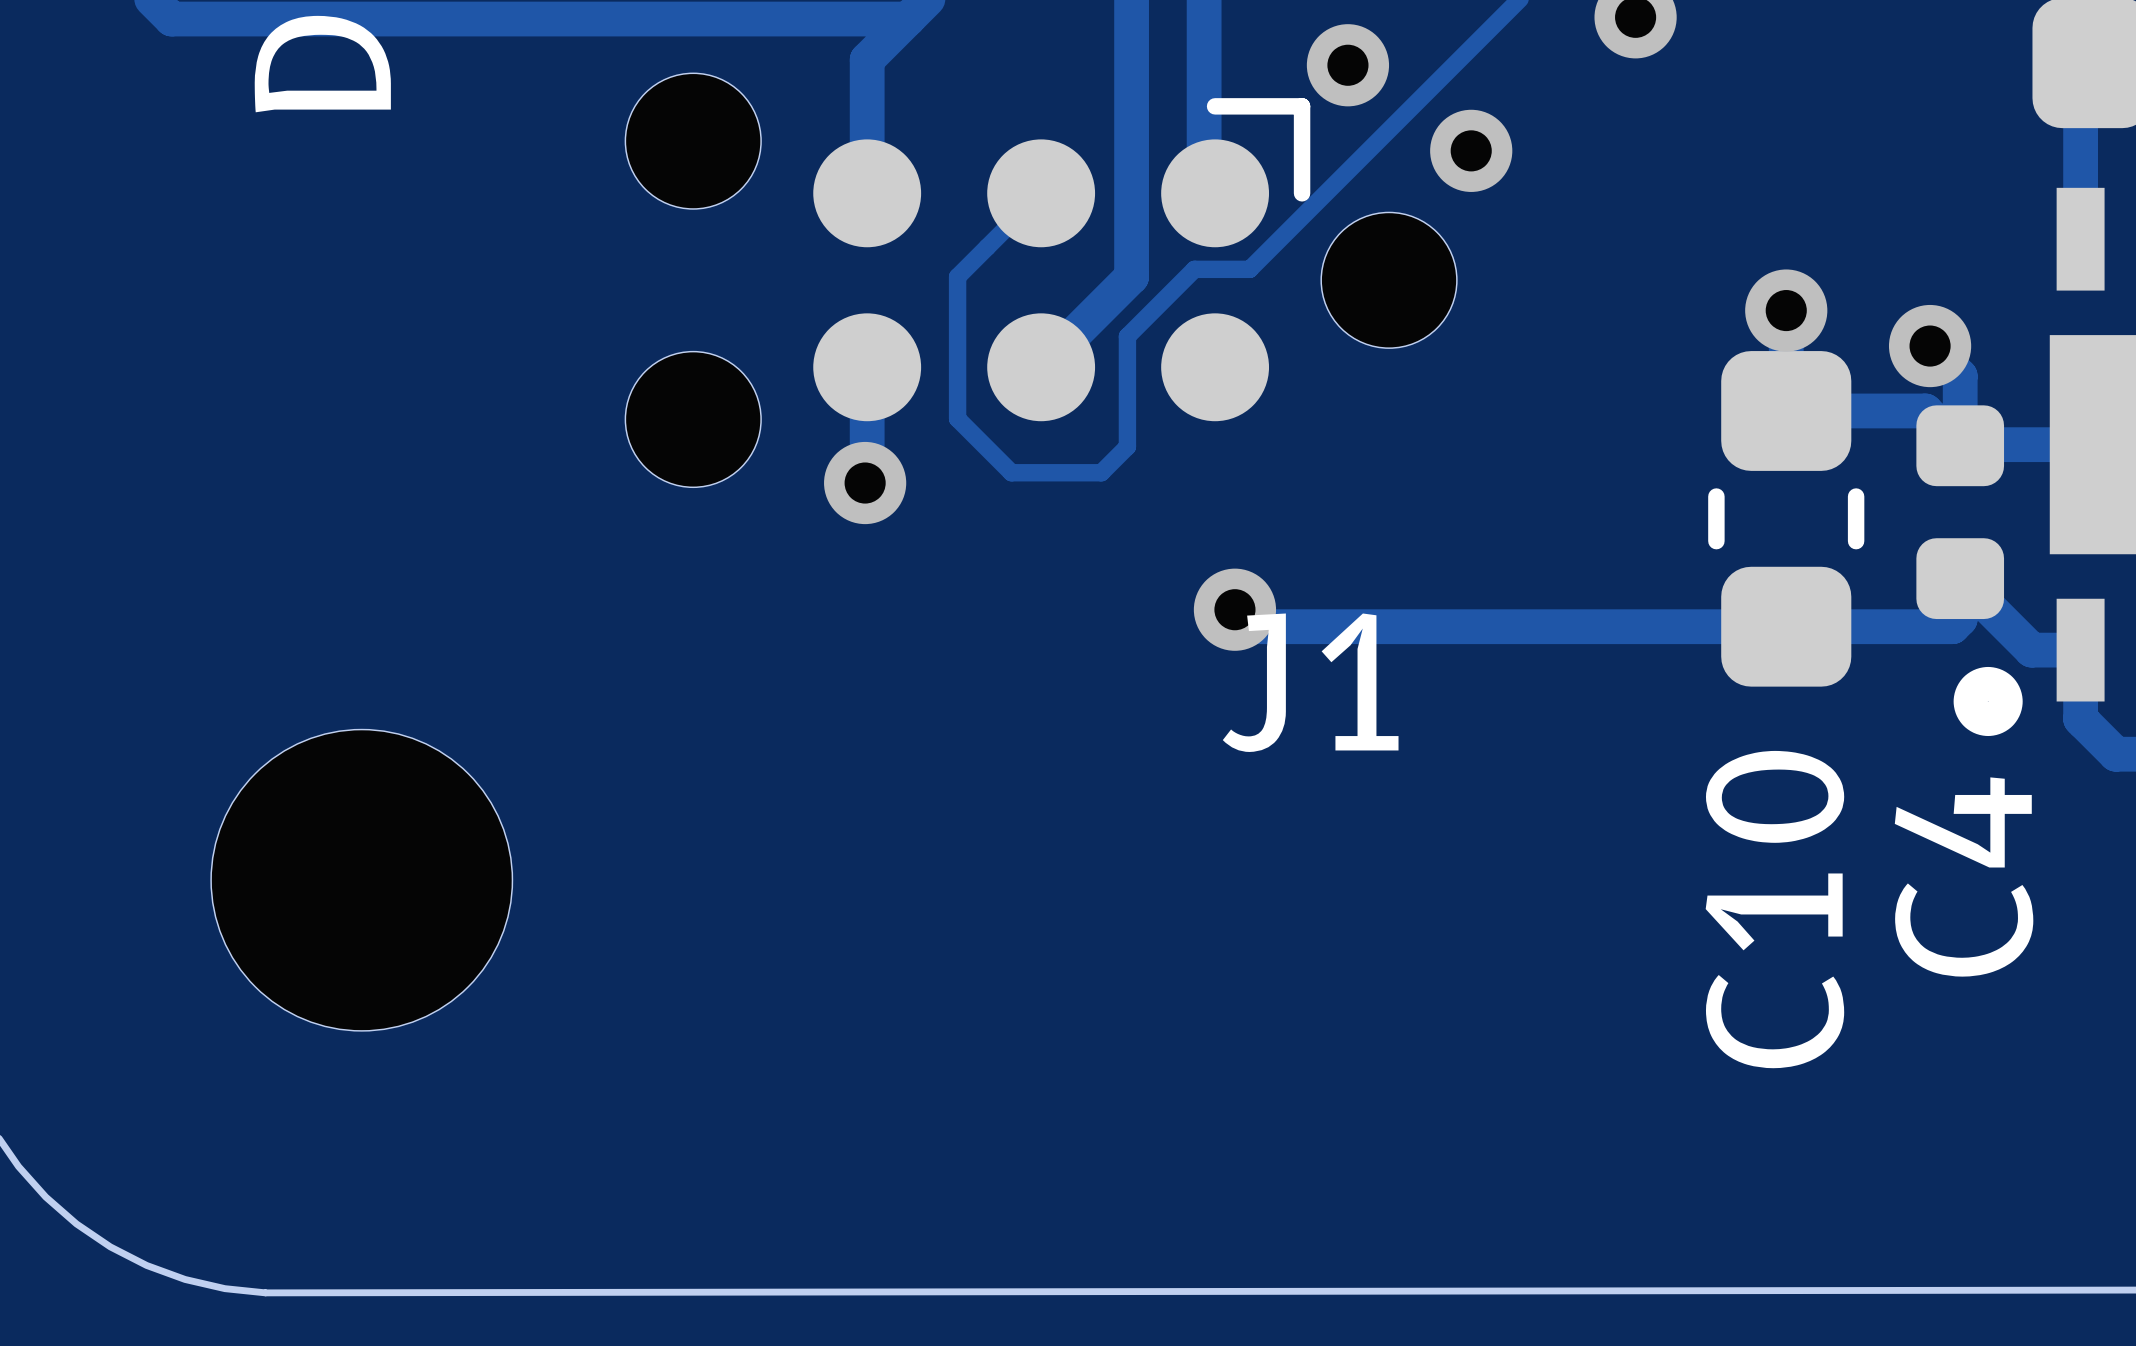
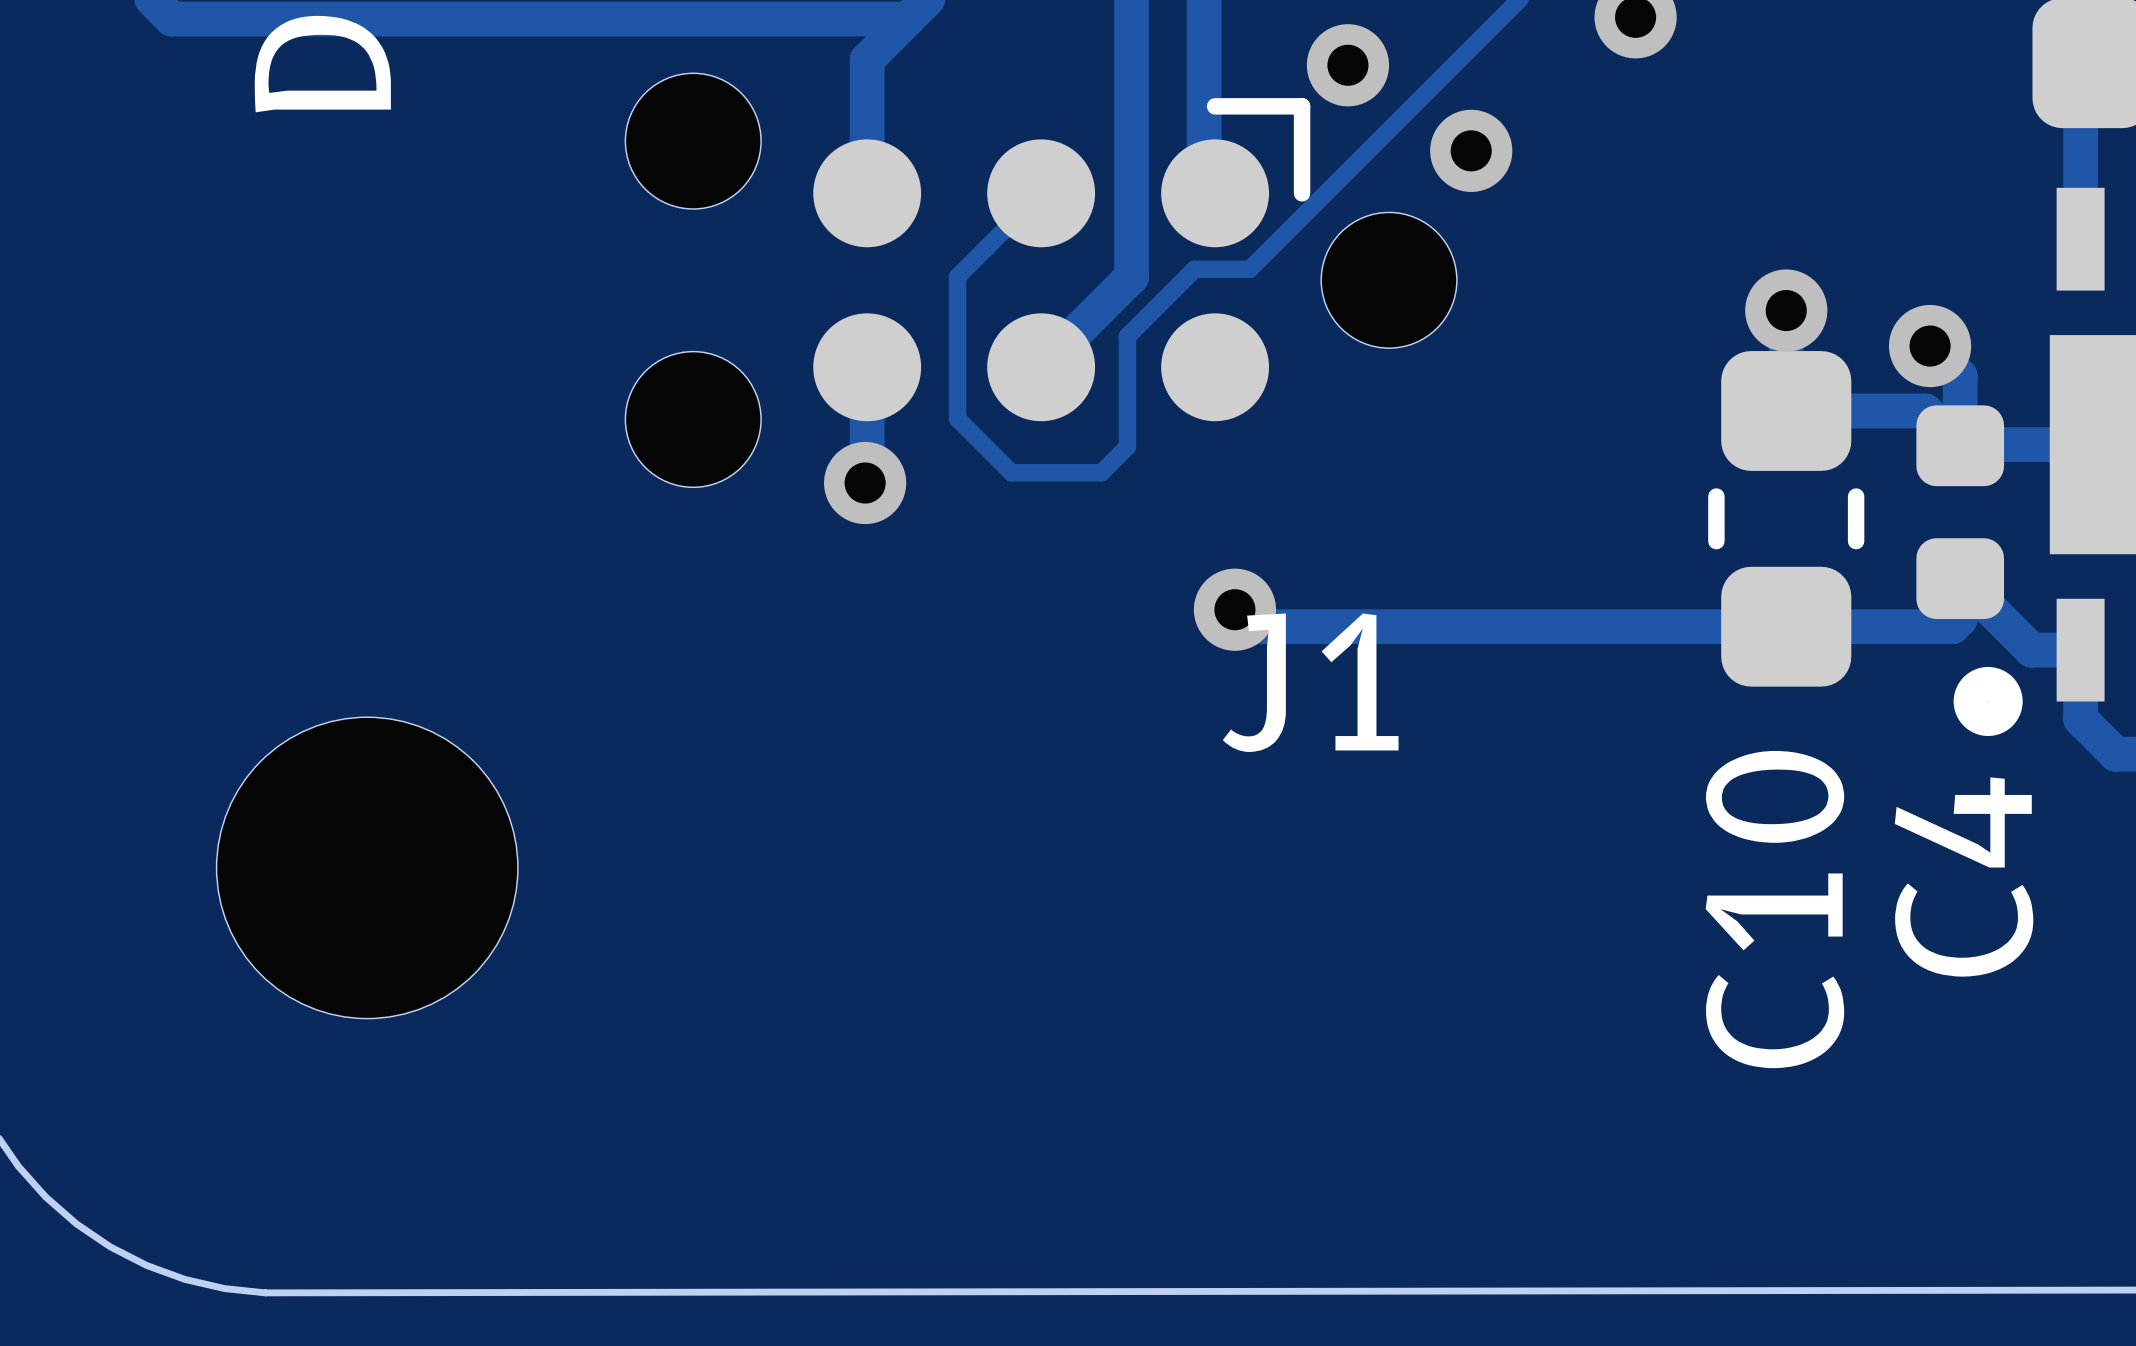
part position: (361, 880) -> (367, 867)

